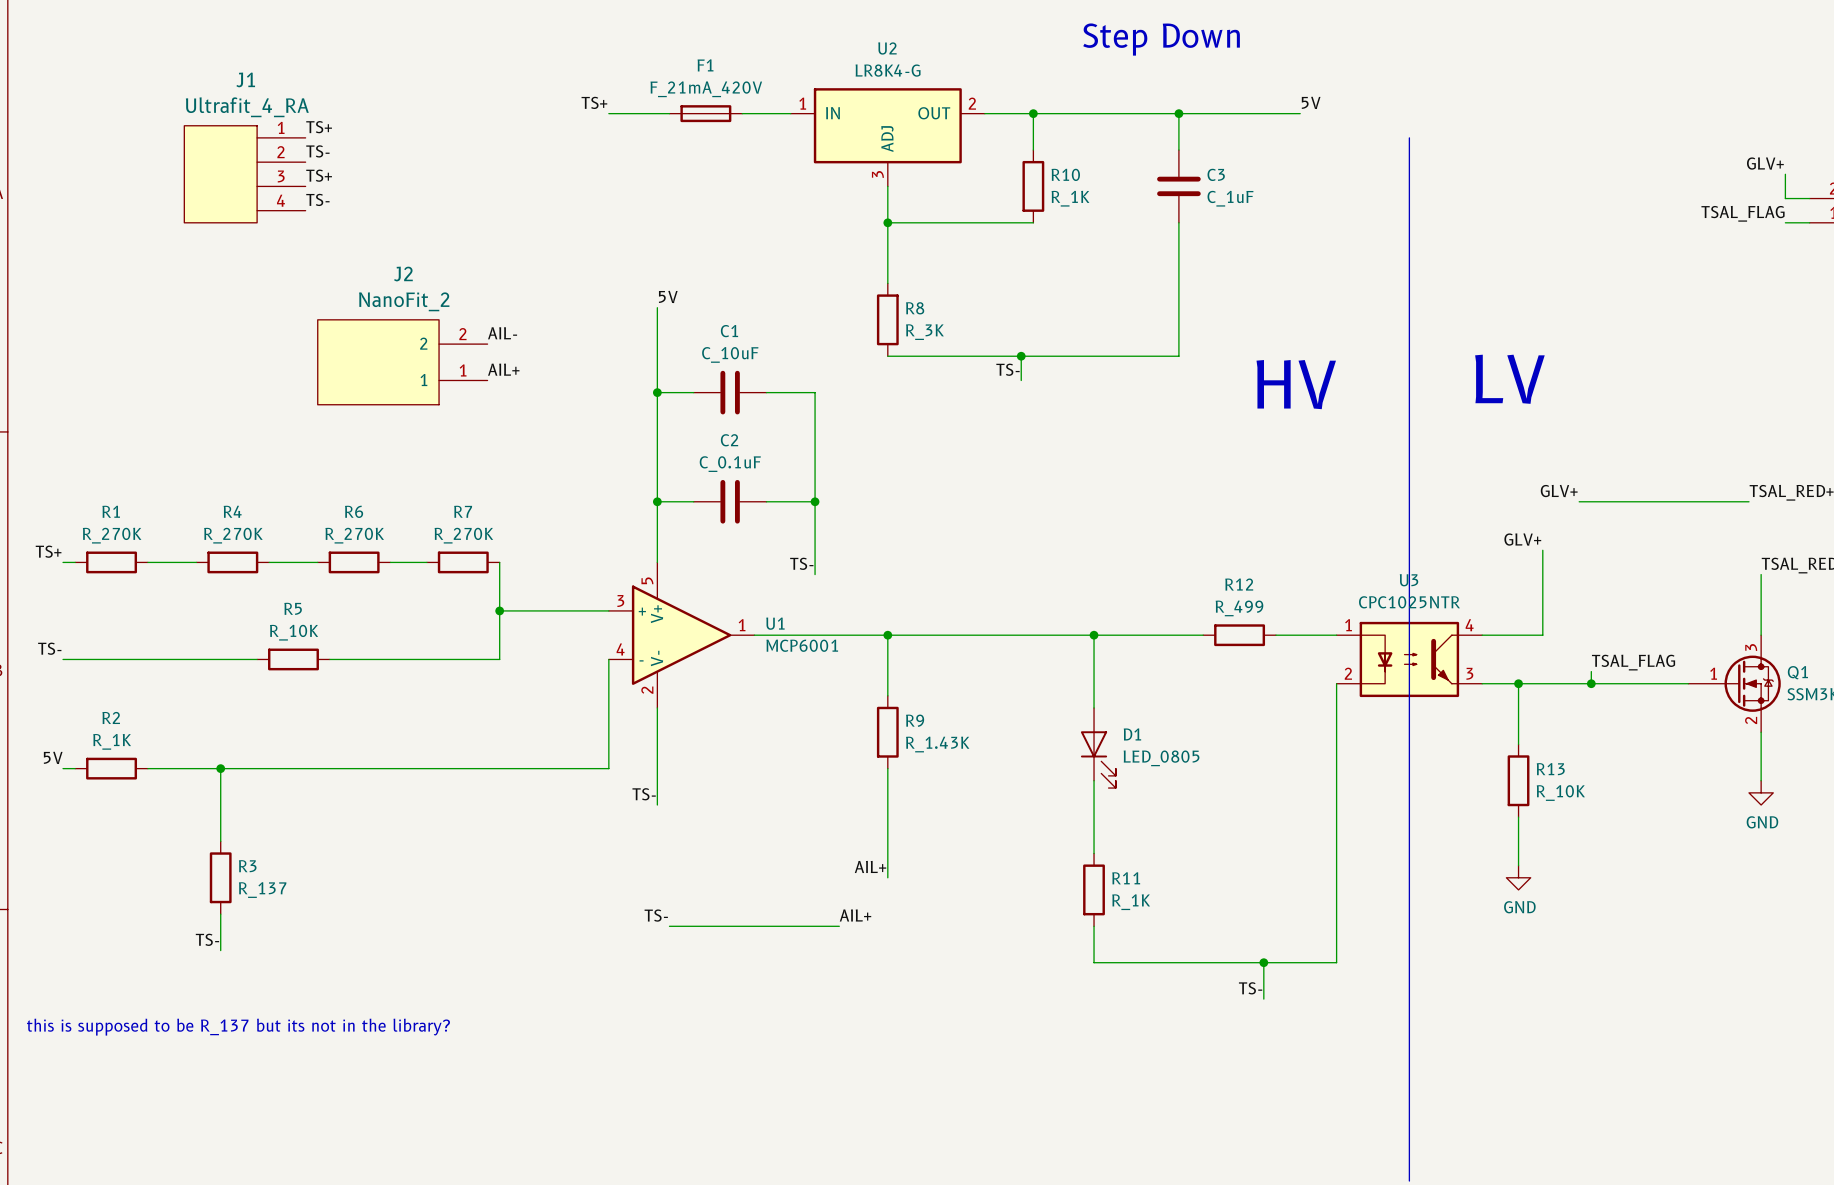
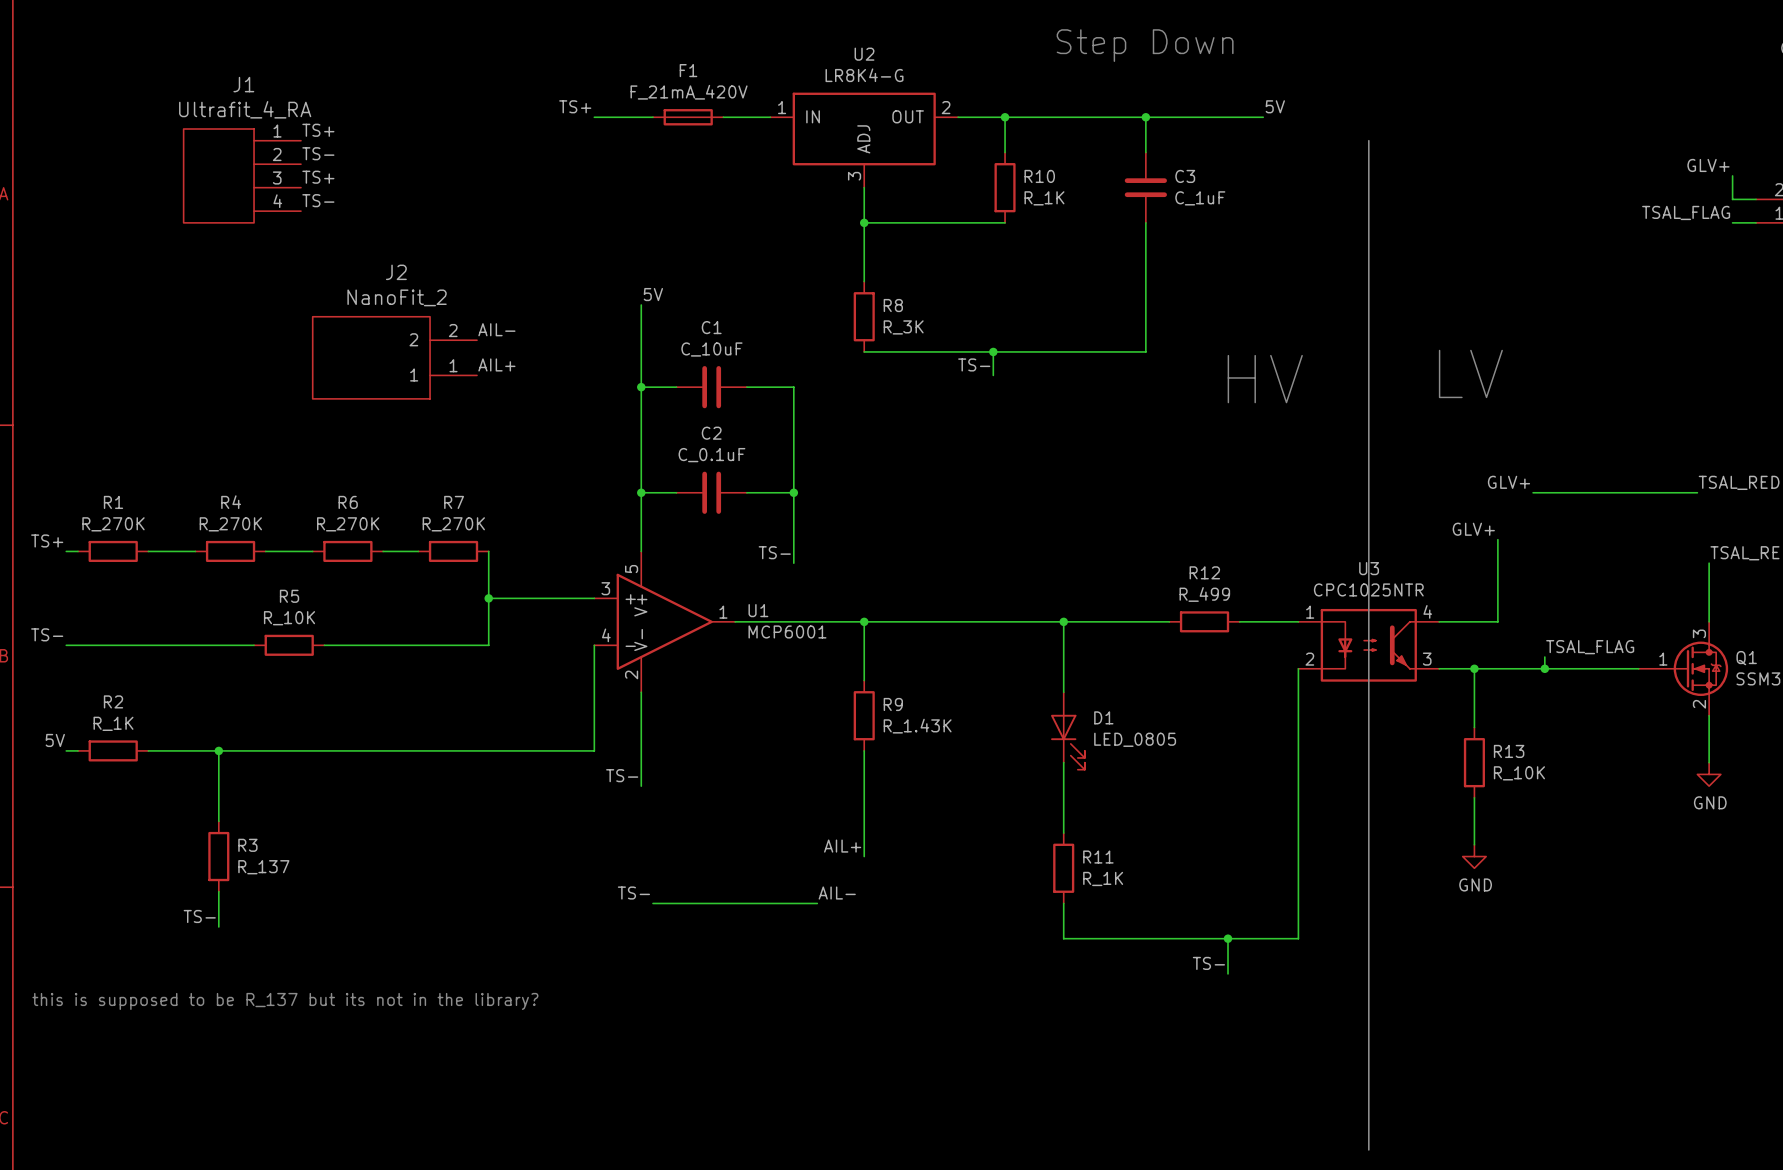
label: AIL+ (855, 915) -> AIL- (837, 893)

